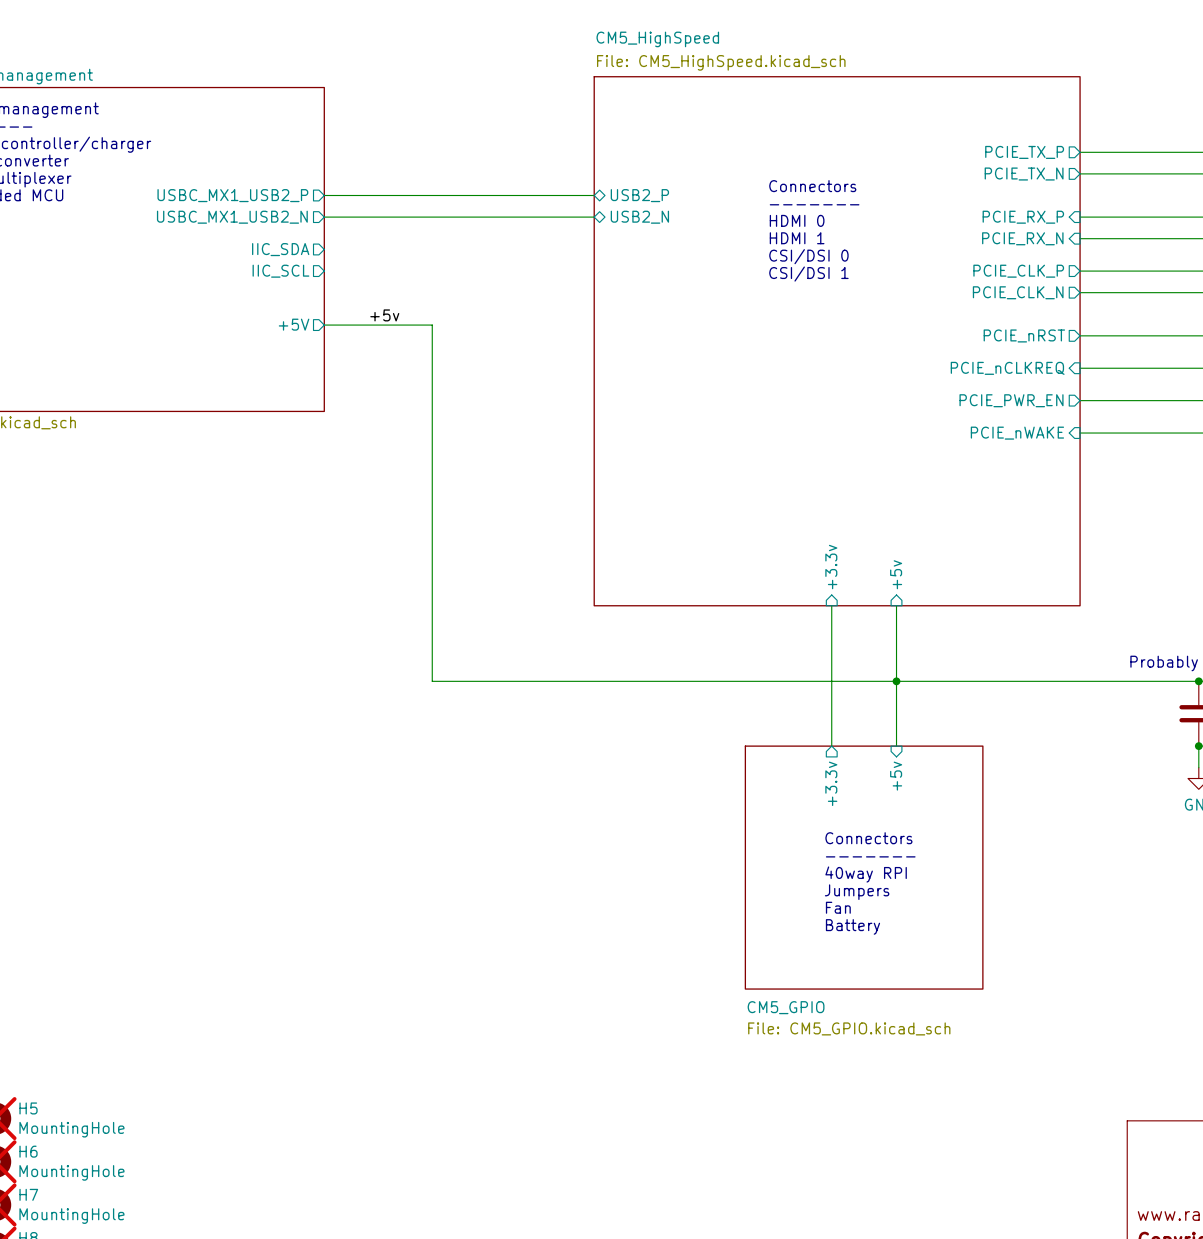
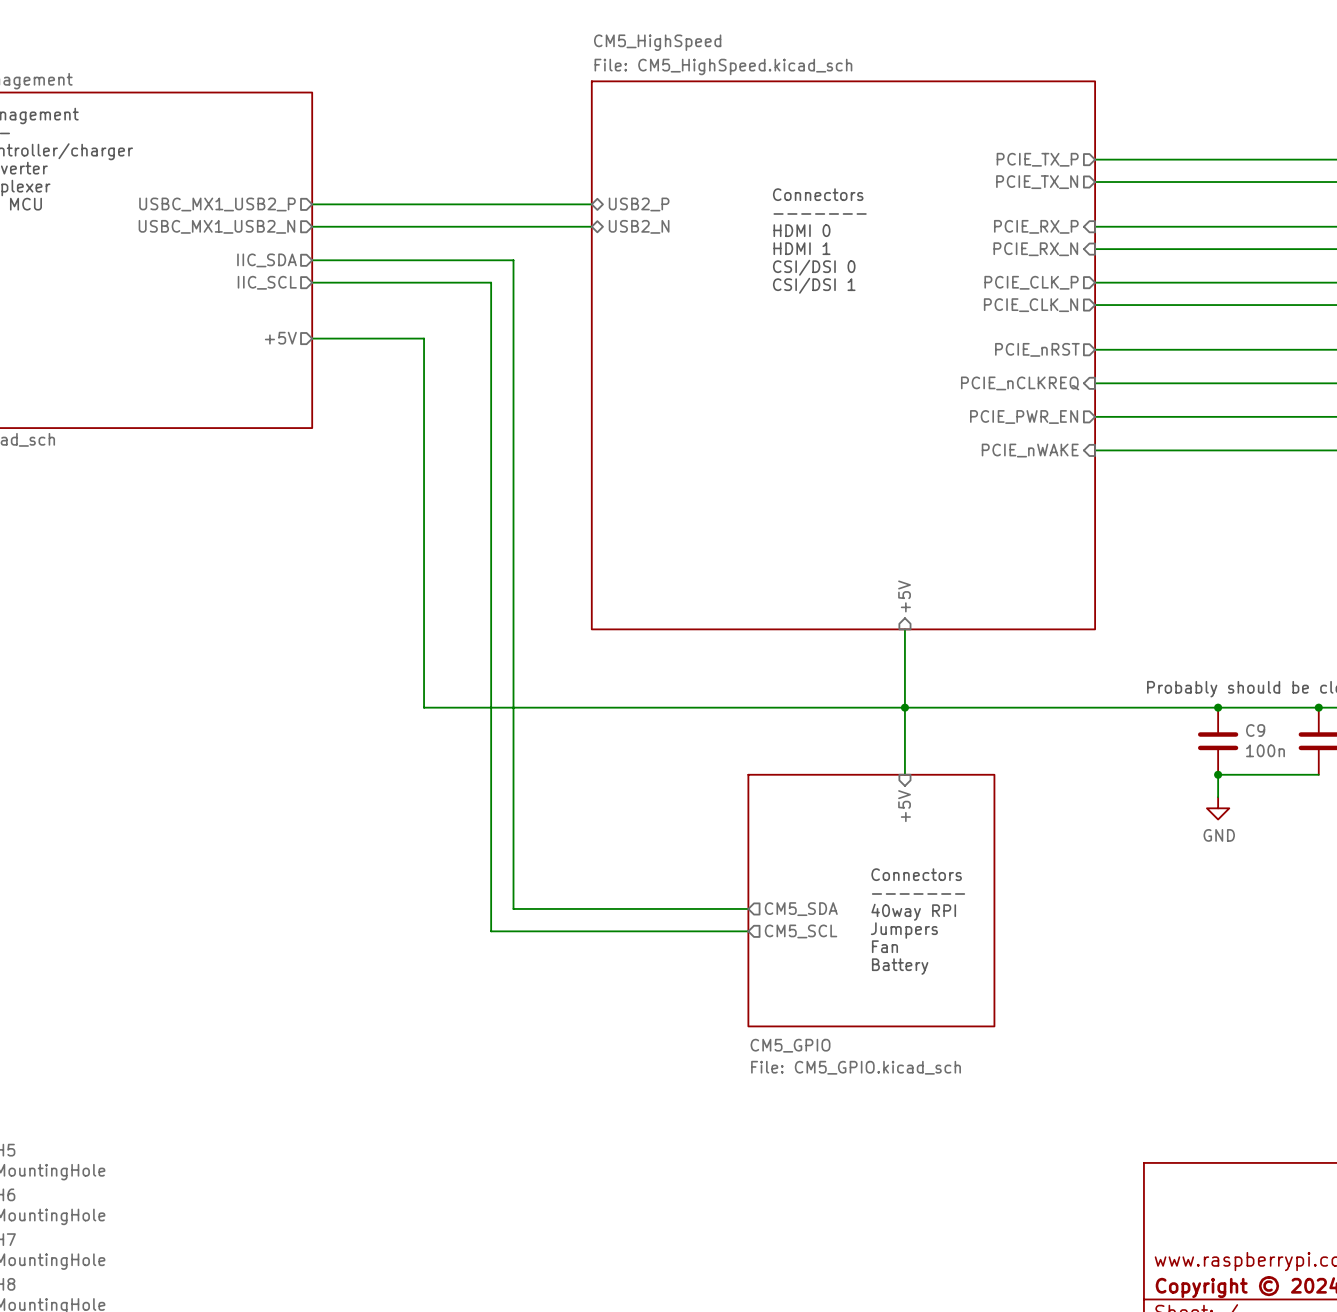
wire: none -> (312, 260) (513, 260) (513, 908) (748, 908)
wire: none -> (312, 282) (491, 282) (491, 931) (748, 931)
label: +5v (384, 315) -> none
sheet pin: +3.3v (831, 567) -> none
sheet pin: +5v (896, 574) -> +5V (904, 596)
wire: (831, 605) (831, 746) -> none
sheet pin: +5v (896, 776) -> +5V (904, 806)
sheet pin: +3.3v (831, 783) -> none
text position: Connectors (868, 838) -> Connectors (916, 874)
text position: ------- (870, 856) -> ------- (918, 893)
text position: 40way RPI (866, 874) -> 40way RPI (913, 912)
sheet pin: none -> CM5_SDA (801, 909)
text position: Jumpers (857, 892) -> Jumpers (904, 930)
sheet pin: none -> CM5_SCL (801, 931)
text position: Fan (838, 907) -> Fan (884, 946)
text position: Battery (853, 926) -> Battery (900, 966)

